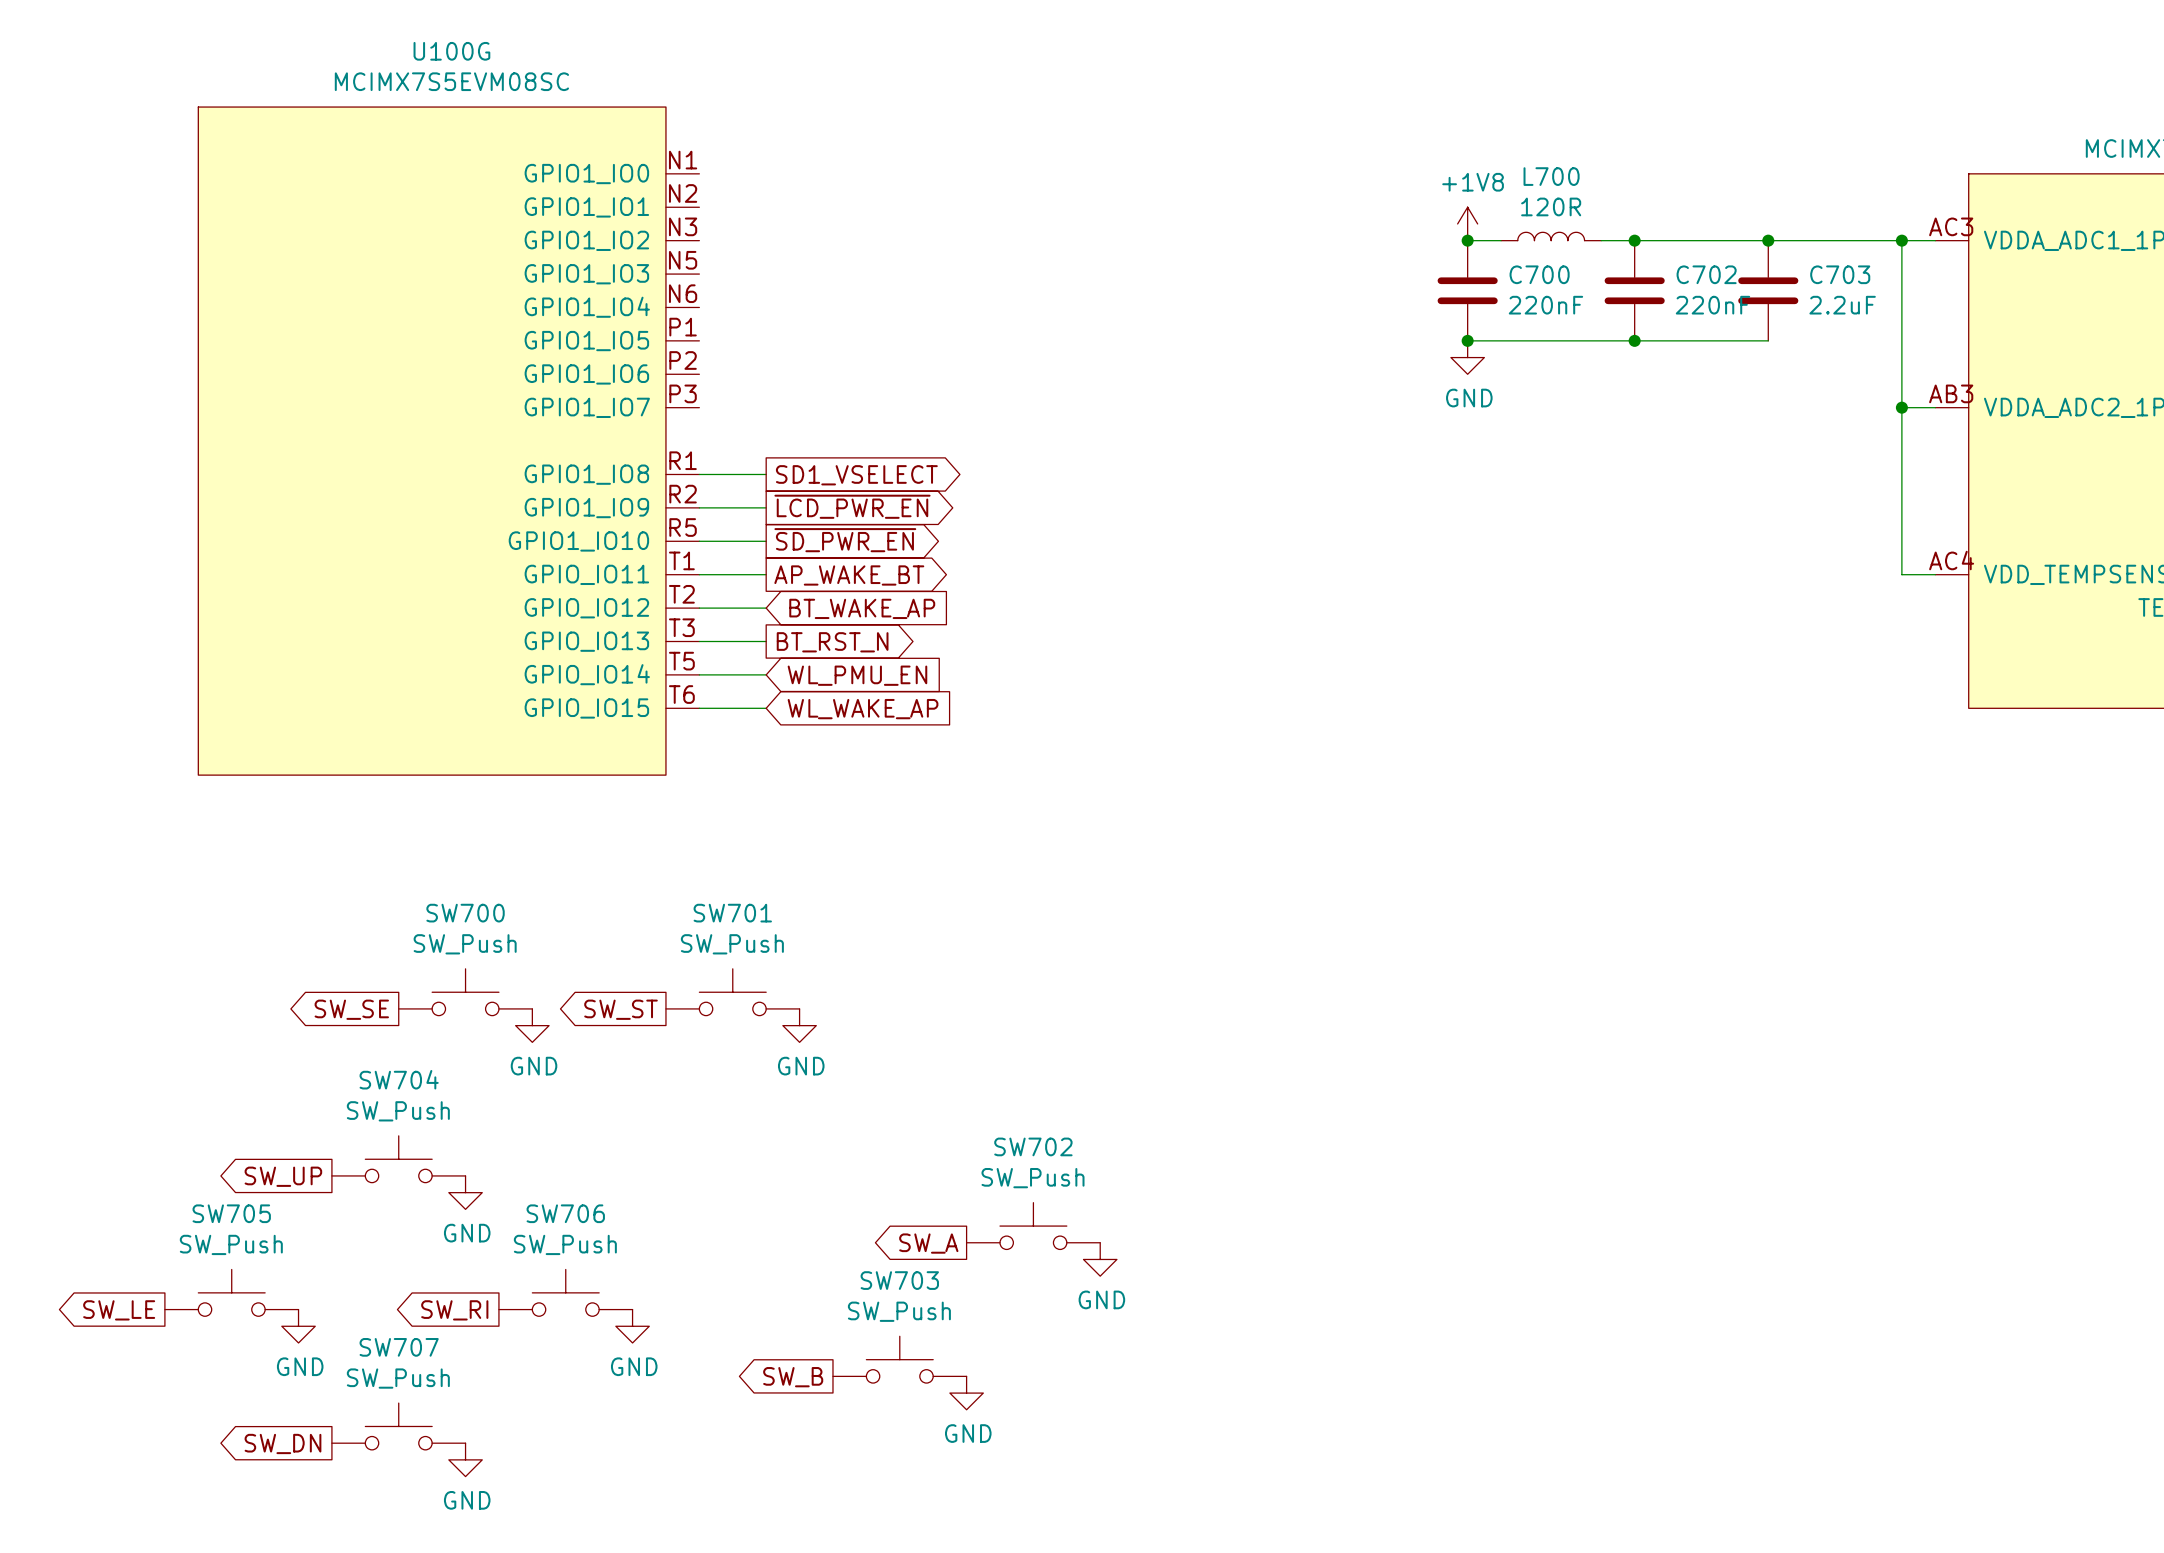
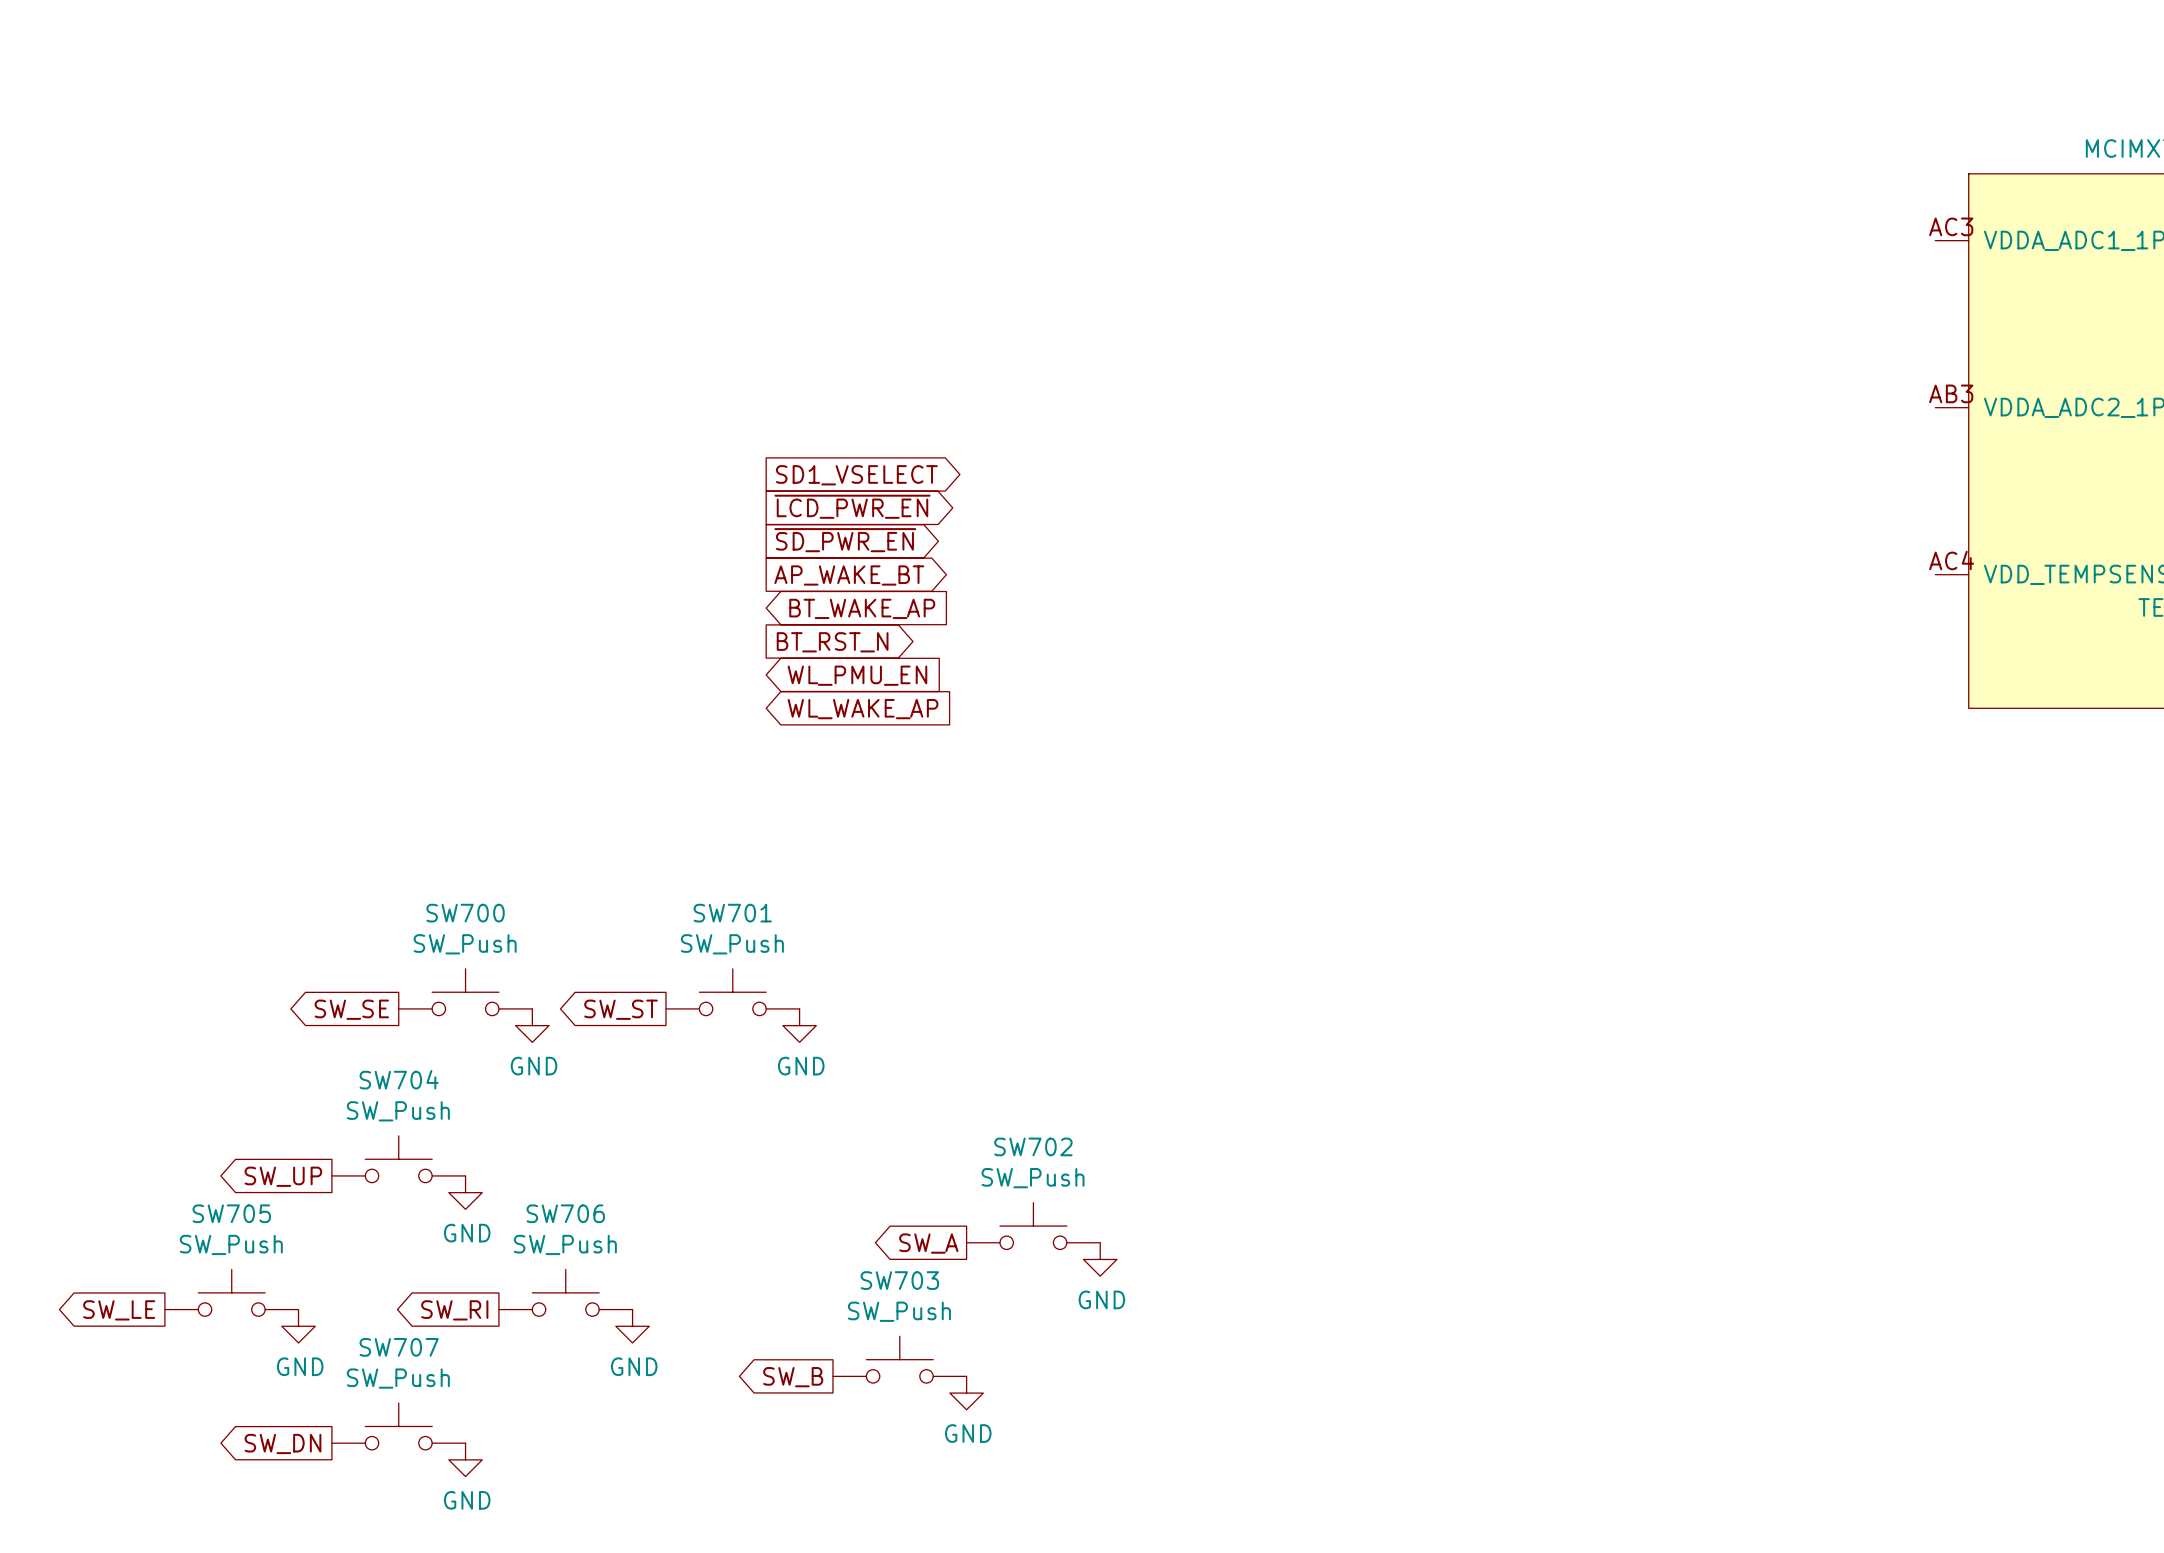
power symbol: +1V8 (1467, 223) -> none
L700: 120R (1551, 236) -> none
wire: (1467, 240) (1501, 240) -> none
junction: (1467, 240) -> none
wire: (1601, 240) (1935, 240) -> none
junction: (1634, 240) -> none
junction: (1768, 240) -> none
wire: (1901, 240) (1901, 574) (1935, 574) -> none
junction: (1901, 240) -> none
C700: 220nF (1467, 290) -> none
C702: 220nF (1634, 290) -> none
C703: 2.2uF (1768, 290) -> none
wire: (1467, 340) (1768, 340) -> none
junction: (1467, 340) -> none
junction: (1634, 340) -> none
power symbol: GND (1467, 357) -> none
wire: (1901, 407) (1935, 407) -> none
junction: (1901, 407) -> none
U100G: MCIMX7S5EVM08SC (448, 441) -> none
wire: (699, 474) (766, 474) -> none
wire: (699, 507) (766, 507) -> none
wire: (699, 541) (766, 541) -> none
wire: (699, 574) (766, 574) -> none
wire: (699, 608) (766, 608) -> none
wire: (699, 641) (766, 641) -> none
wire: (699, 674) (766, 674) -> none
wire: (699, 708) (766, 708) -> none

